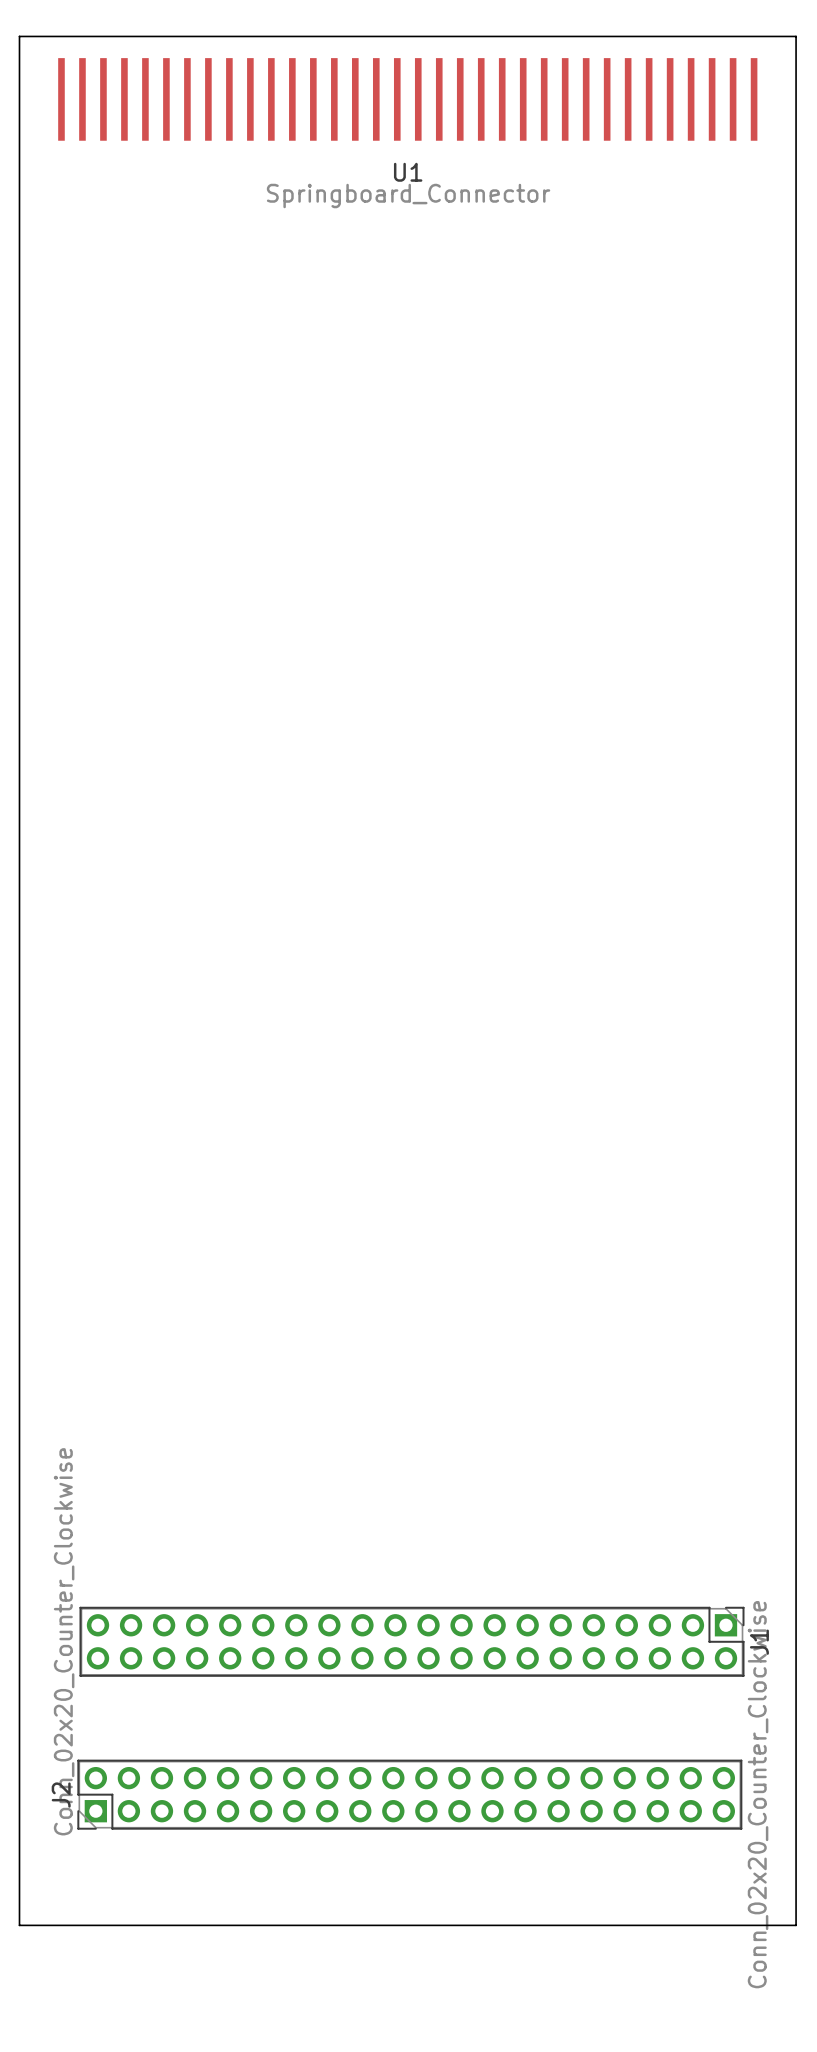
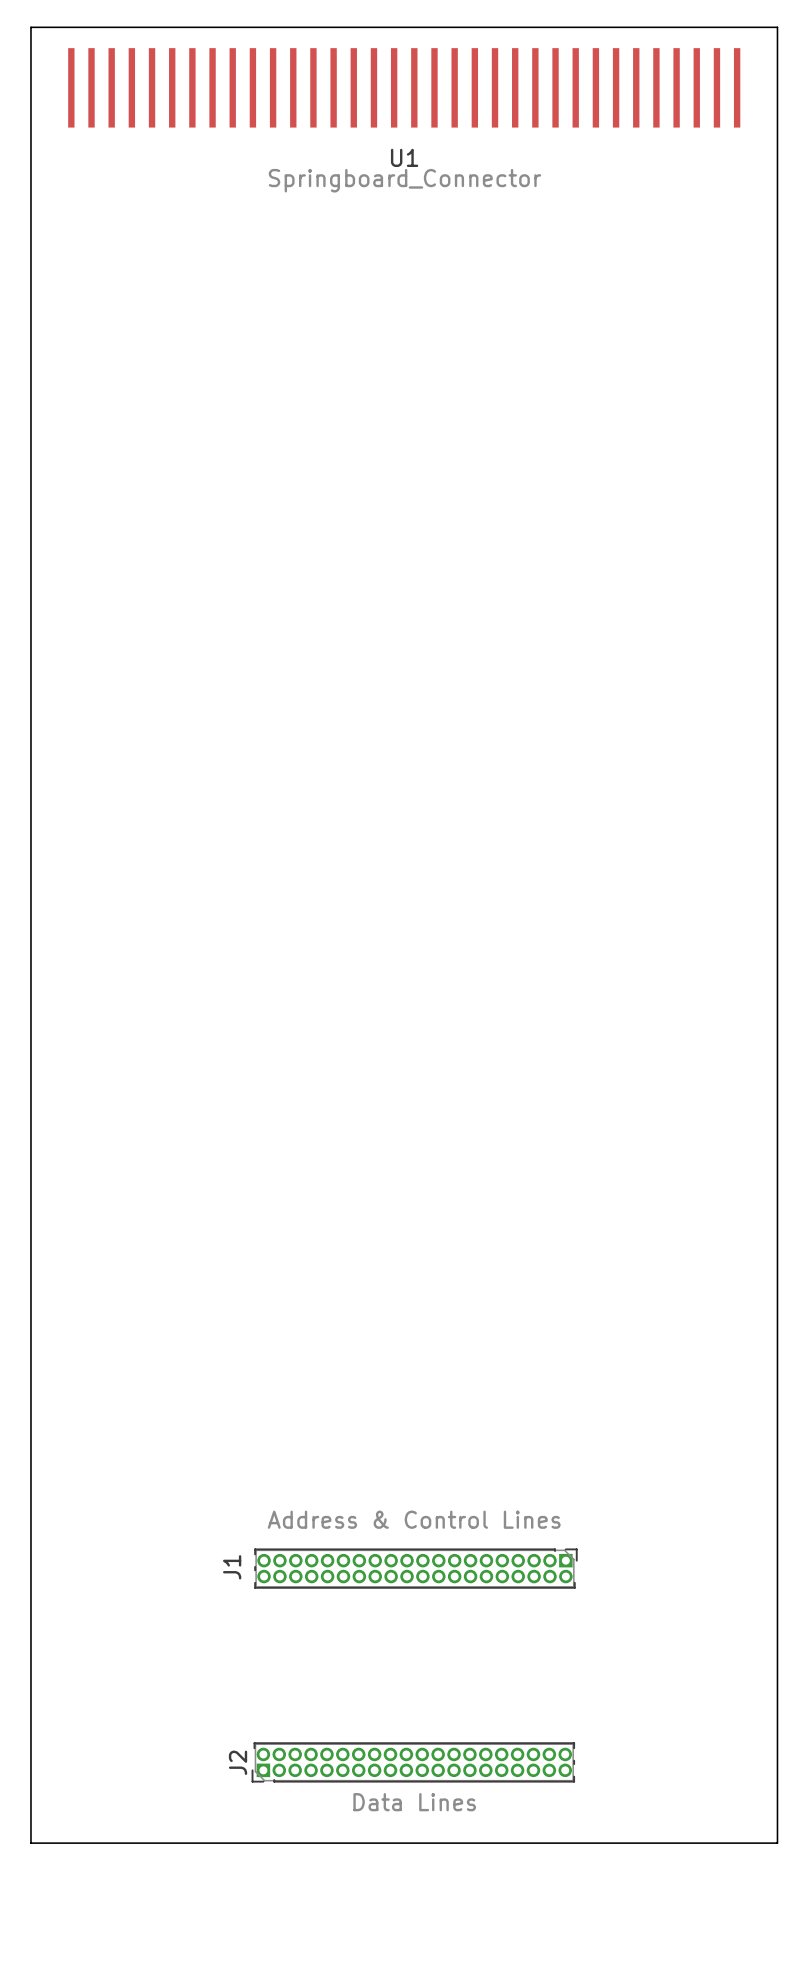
J1 footprint: [79, 1606, 745, 1677] -> [254, 1548, 578, 1589]
J1 value: Conn_02x20_Counter_Clockwise (64, 1641) -> Address & Control Lines (414, 1519)
J1 name position: J1 (759, 1642) -> J1 (232, 1567)
J2 footprint: [77, 1759, 743, 1830] -> [251, 1742, 576, 1783]
J2 value: Conn_02x20_Counter_Clockwise (758, 1794) -> Data Lines (414, 1802)
J2 name position: J2 (61, 1795) -> J2 (238, 1762)

